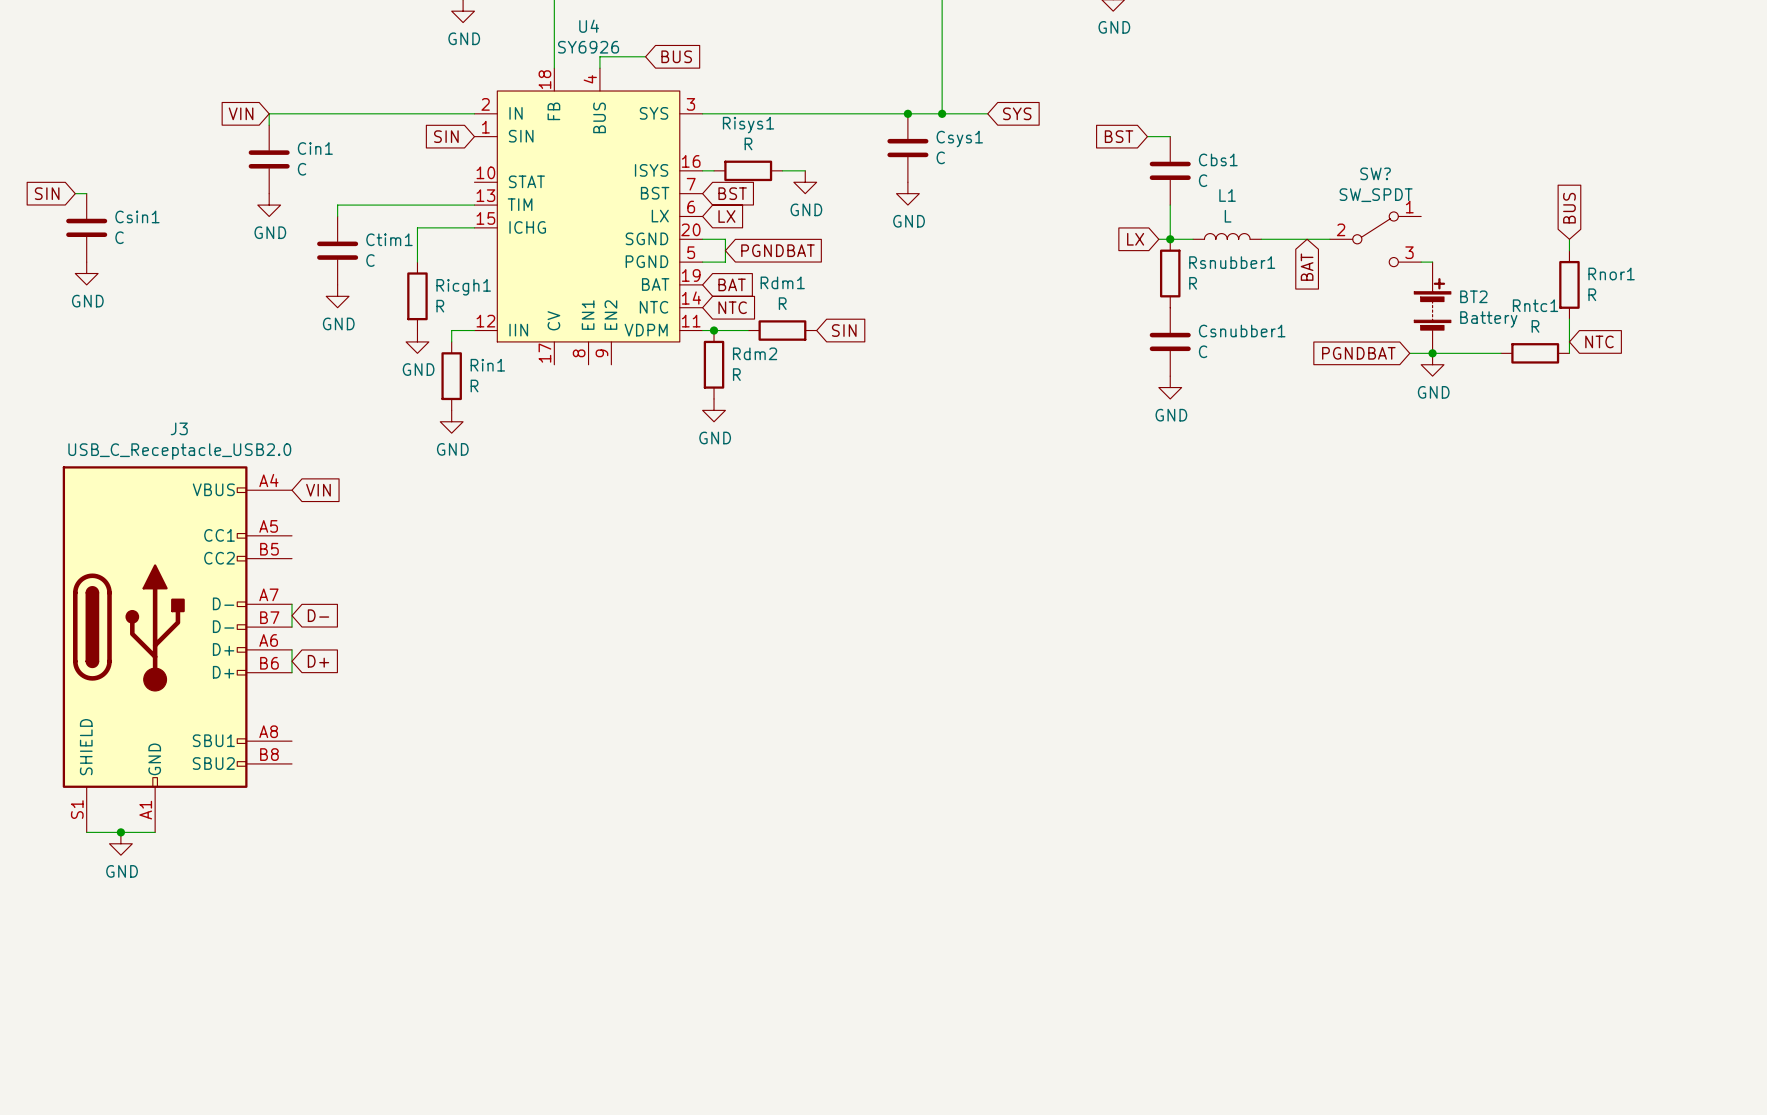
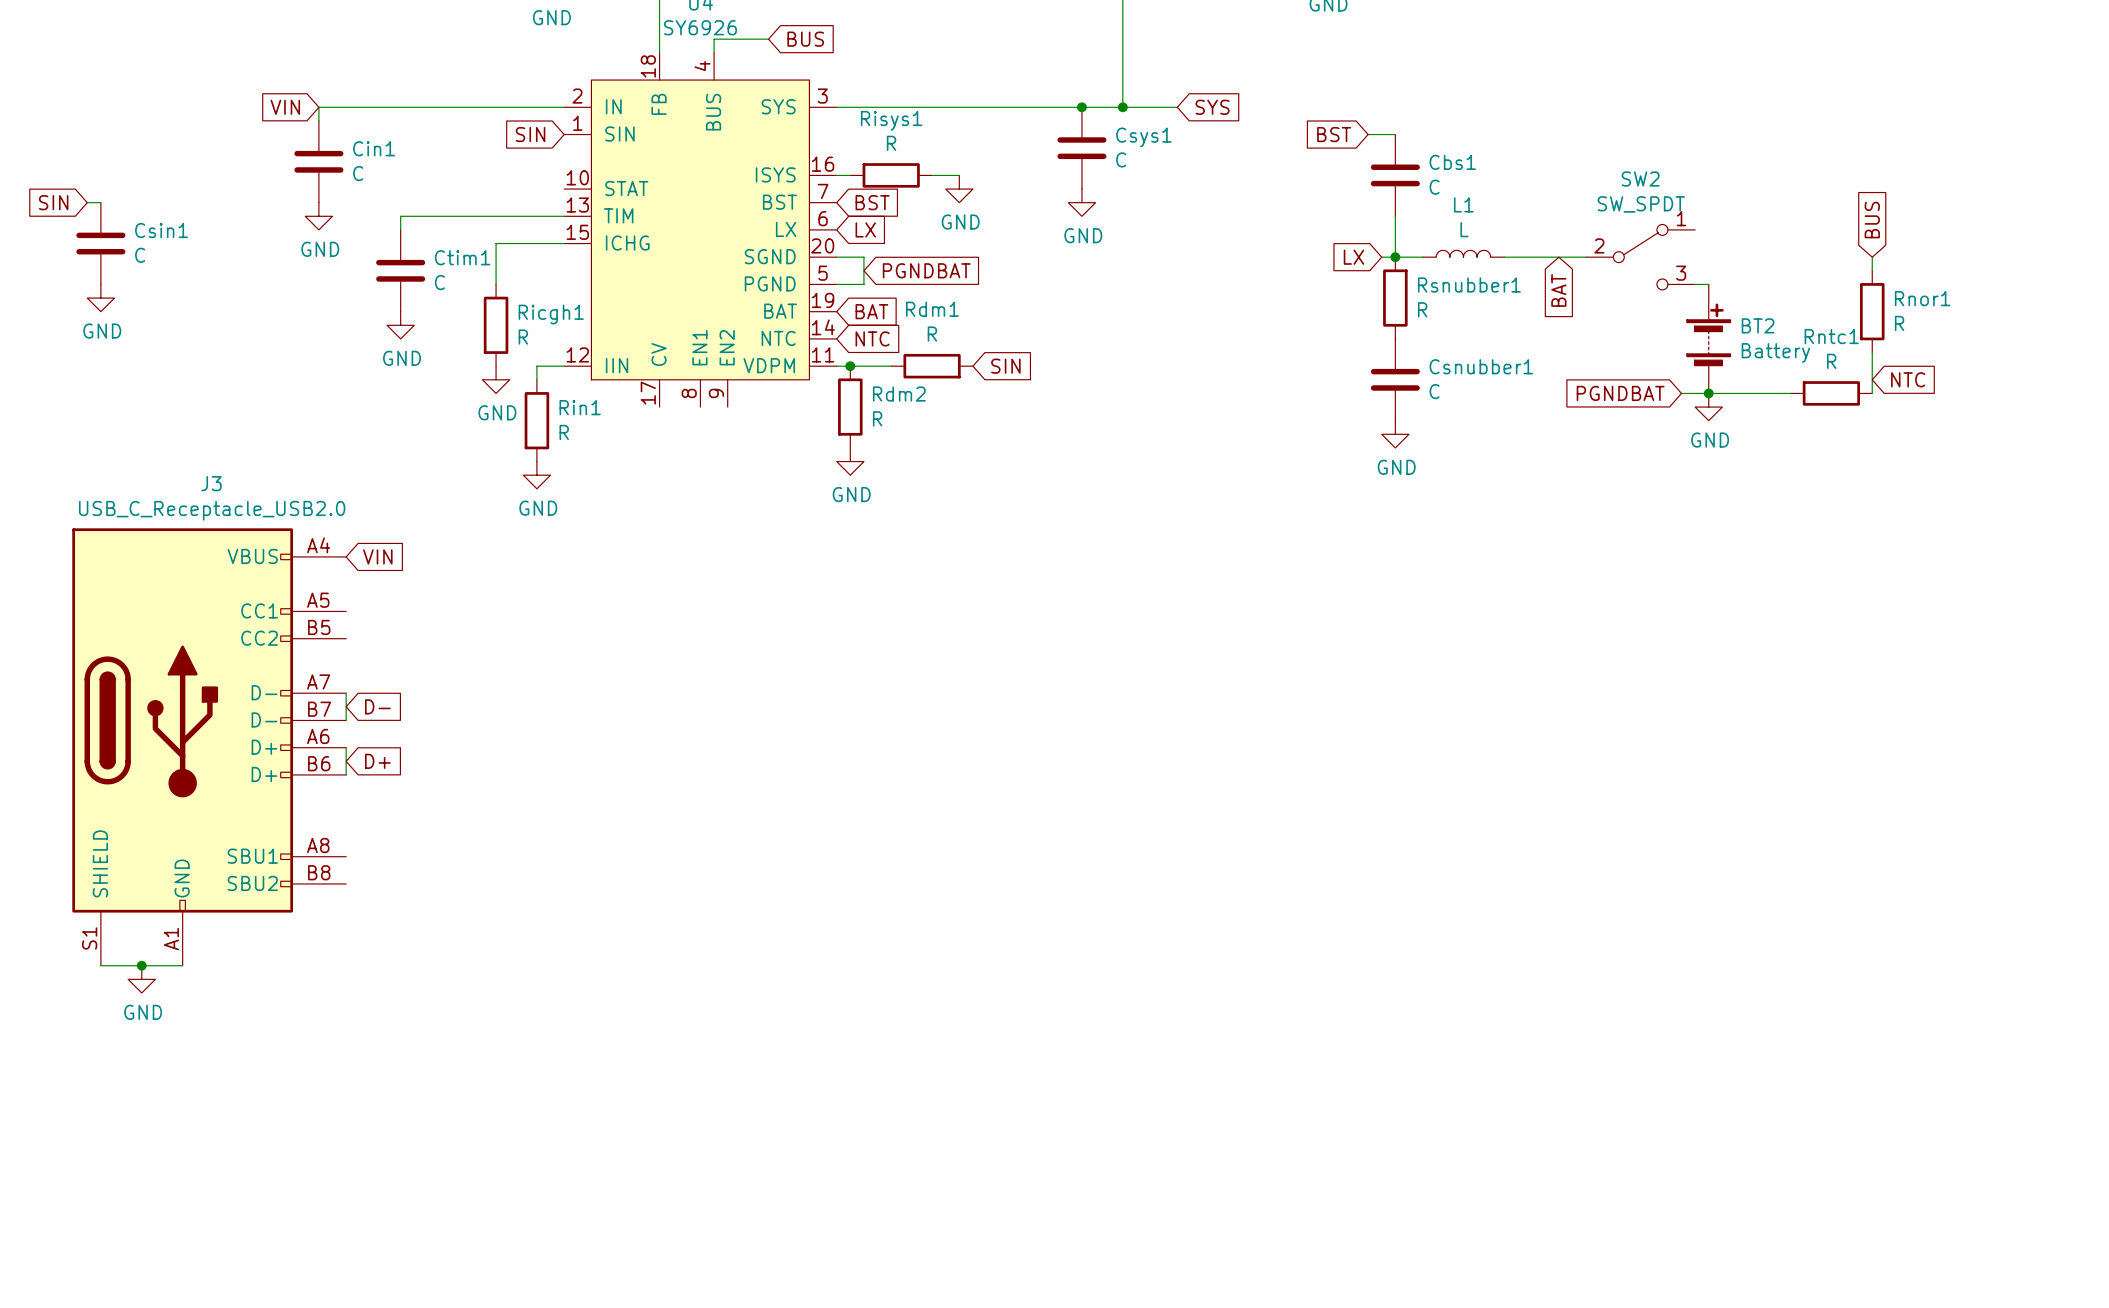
SW? name: SW? (1375, 173) -> SW2 (1640, 179)

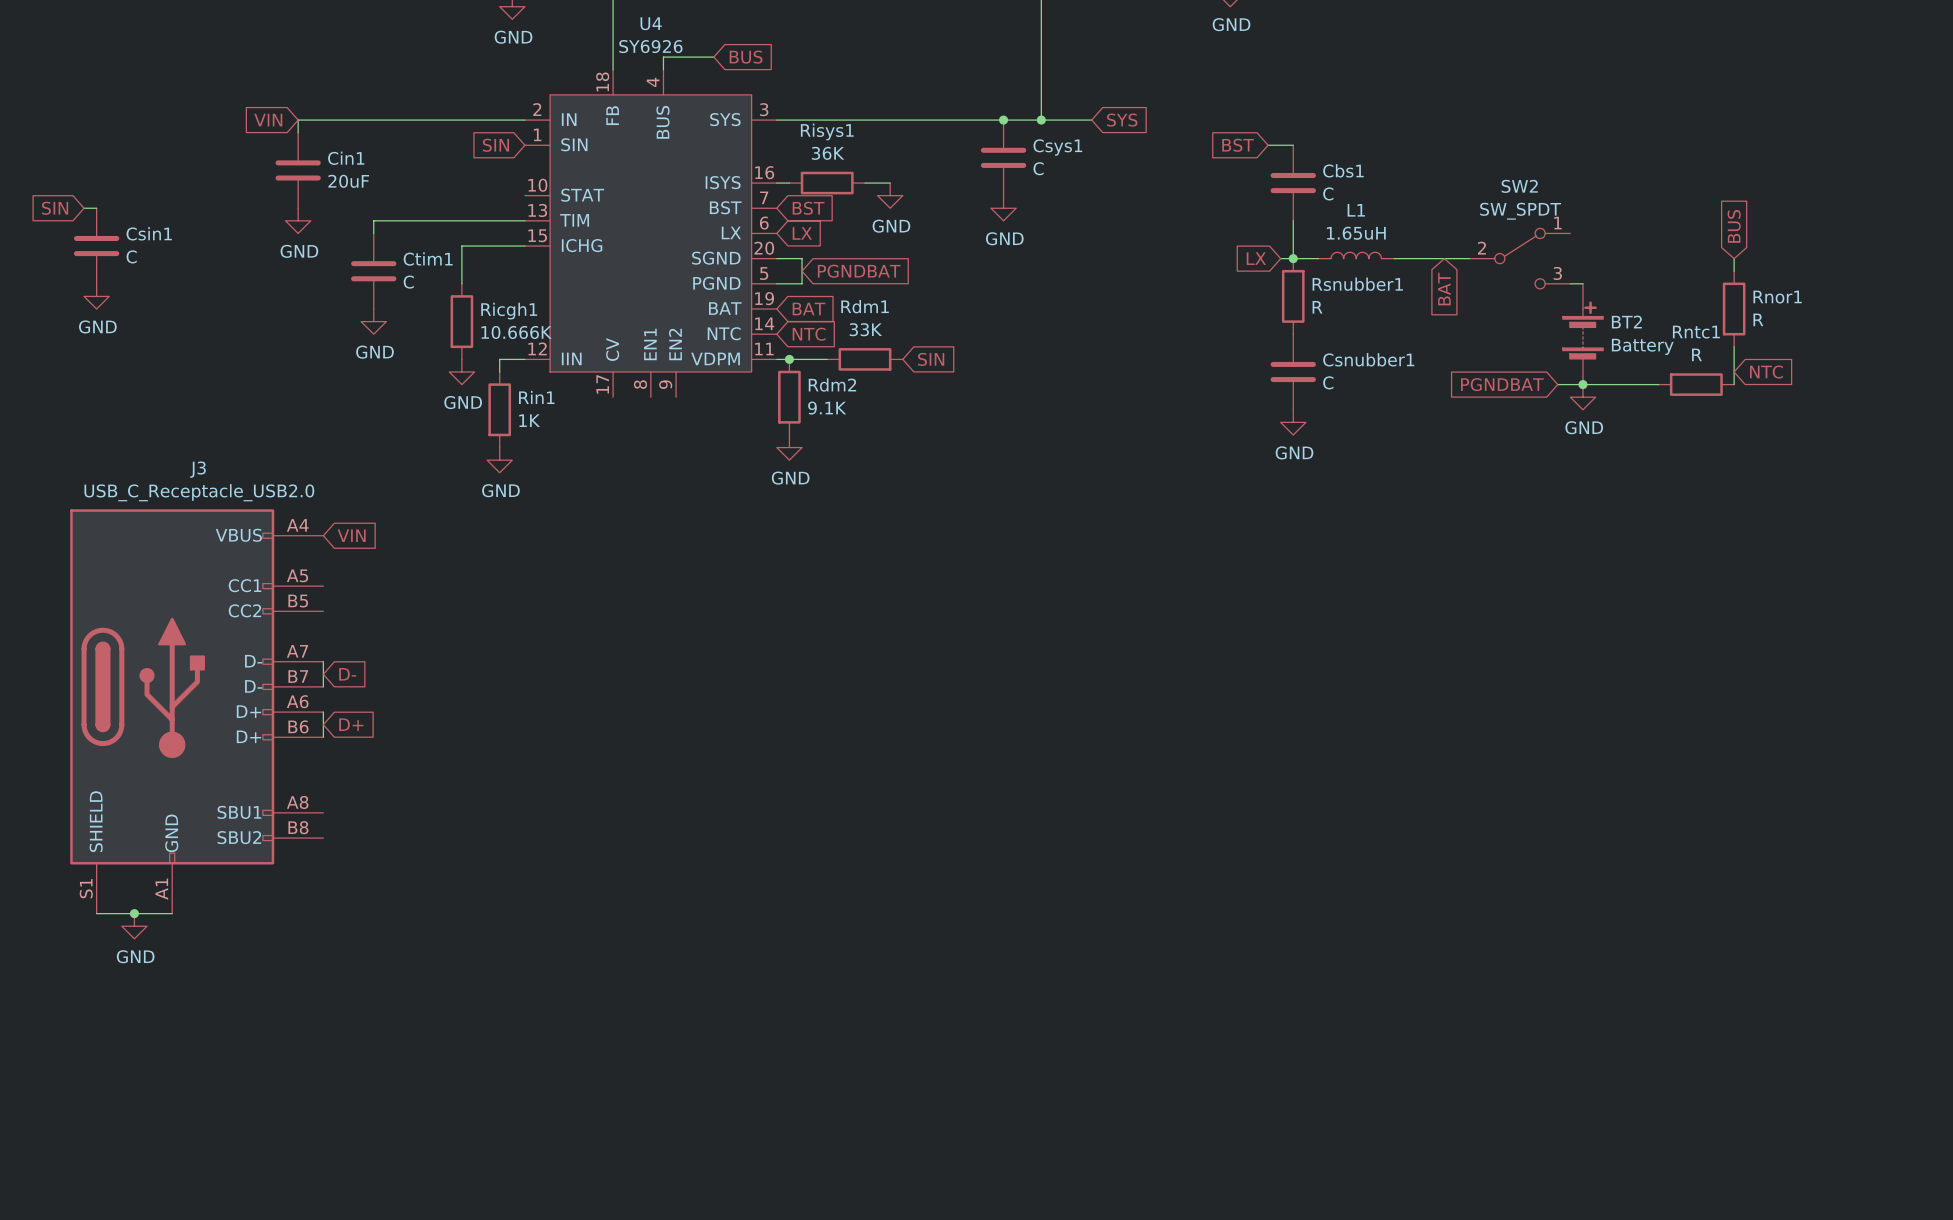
Risys1 value: R (891, 143) -> 36K (828, 153)
Cin1 value: C (358, 173) -> 20uF (348, 181)
L1 value: L (1464, 229) -> 1.65uH (1356, 233)
Rdm1 value: R (932, 334) -> 33K (865, 329)
Ricgh1 value: R (523, 337) -> 10.666K (516, 332)
Rdm2 value: R (877, 418) -> 9.1K (827, 408)
Rin1 value: R (564, 432) -> 1K (529, 420)

